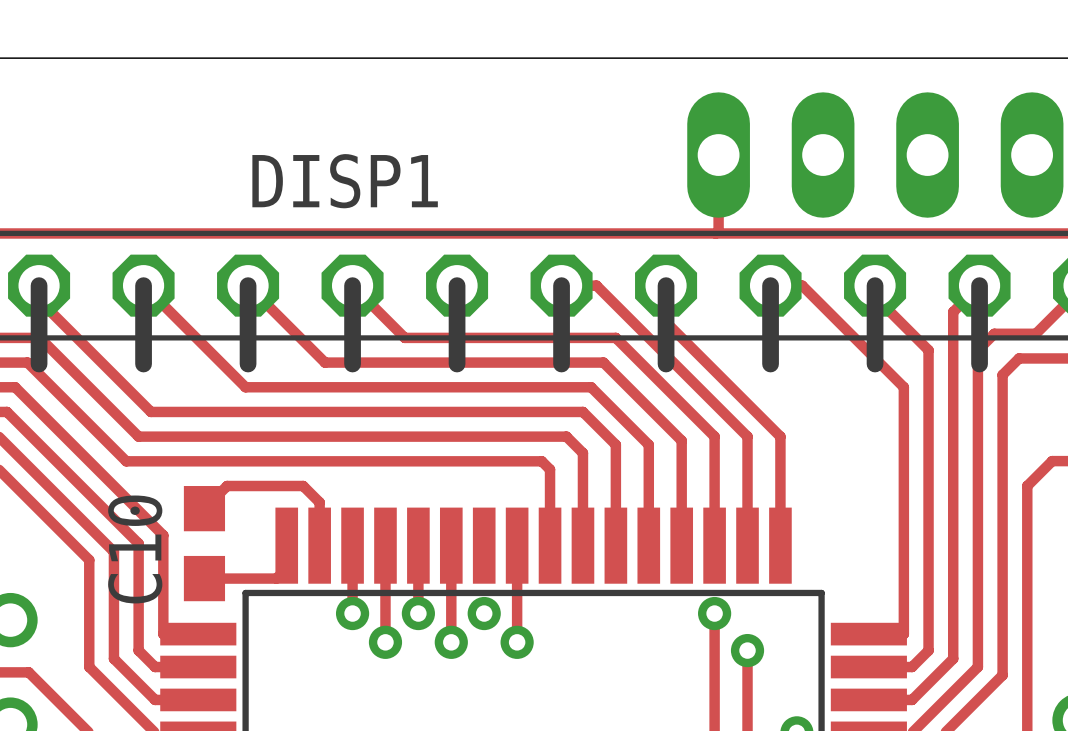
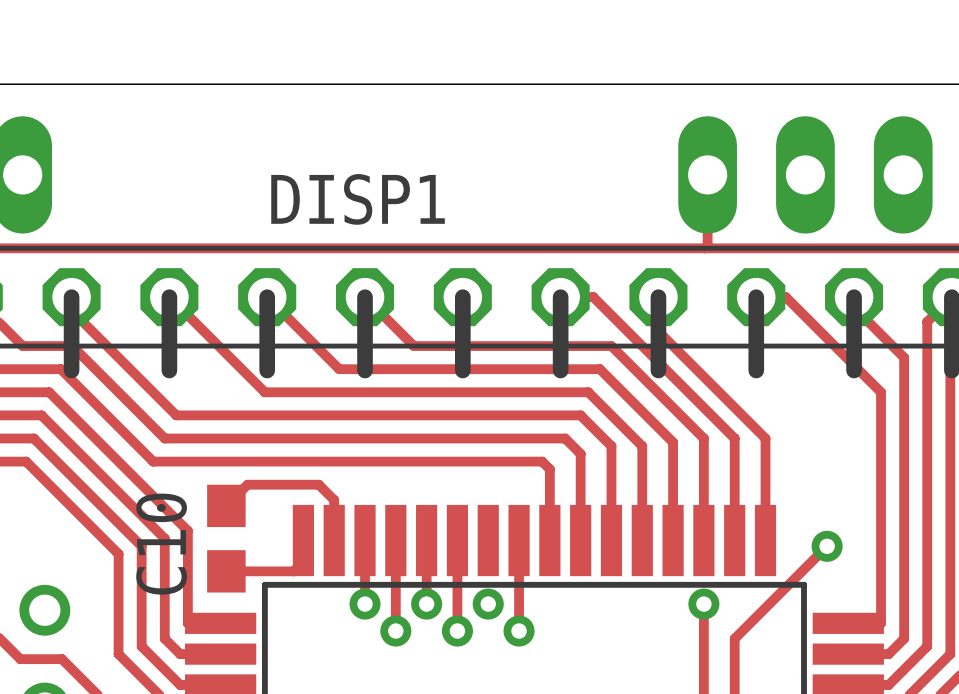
track: none -> (827, 546) (734, 638)
via: none -> (827, 546)
via: (747, 650) -> none

